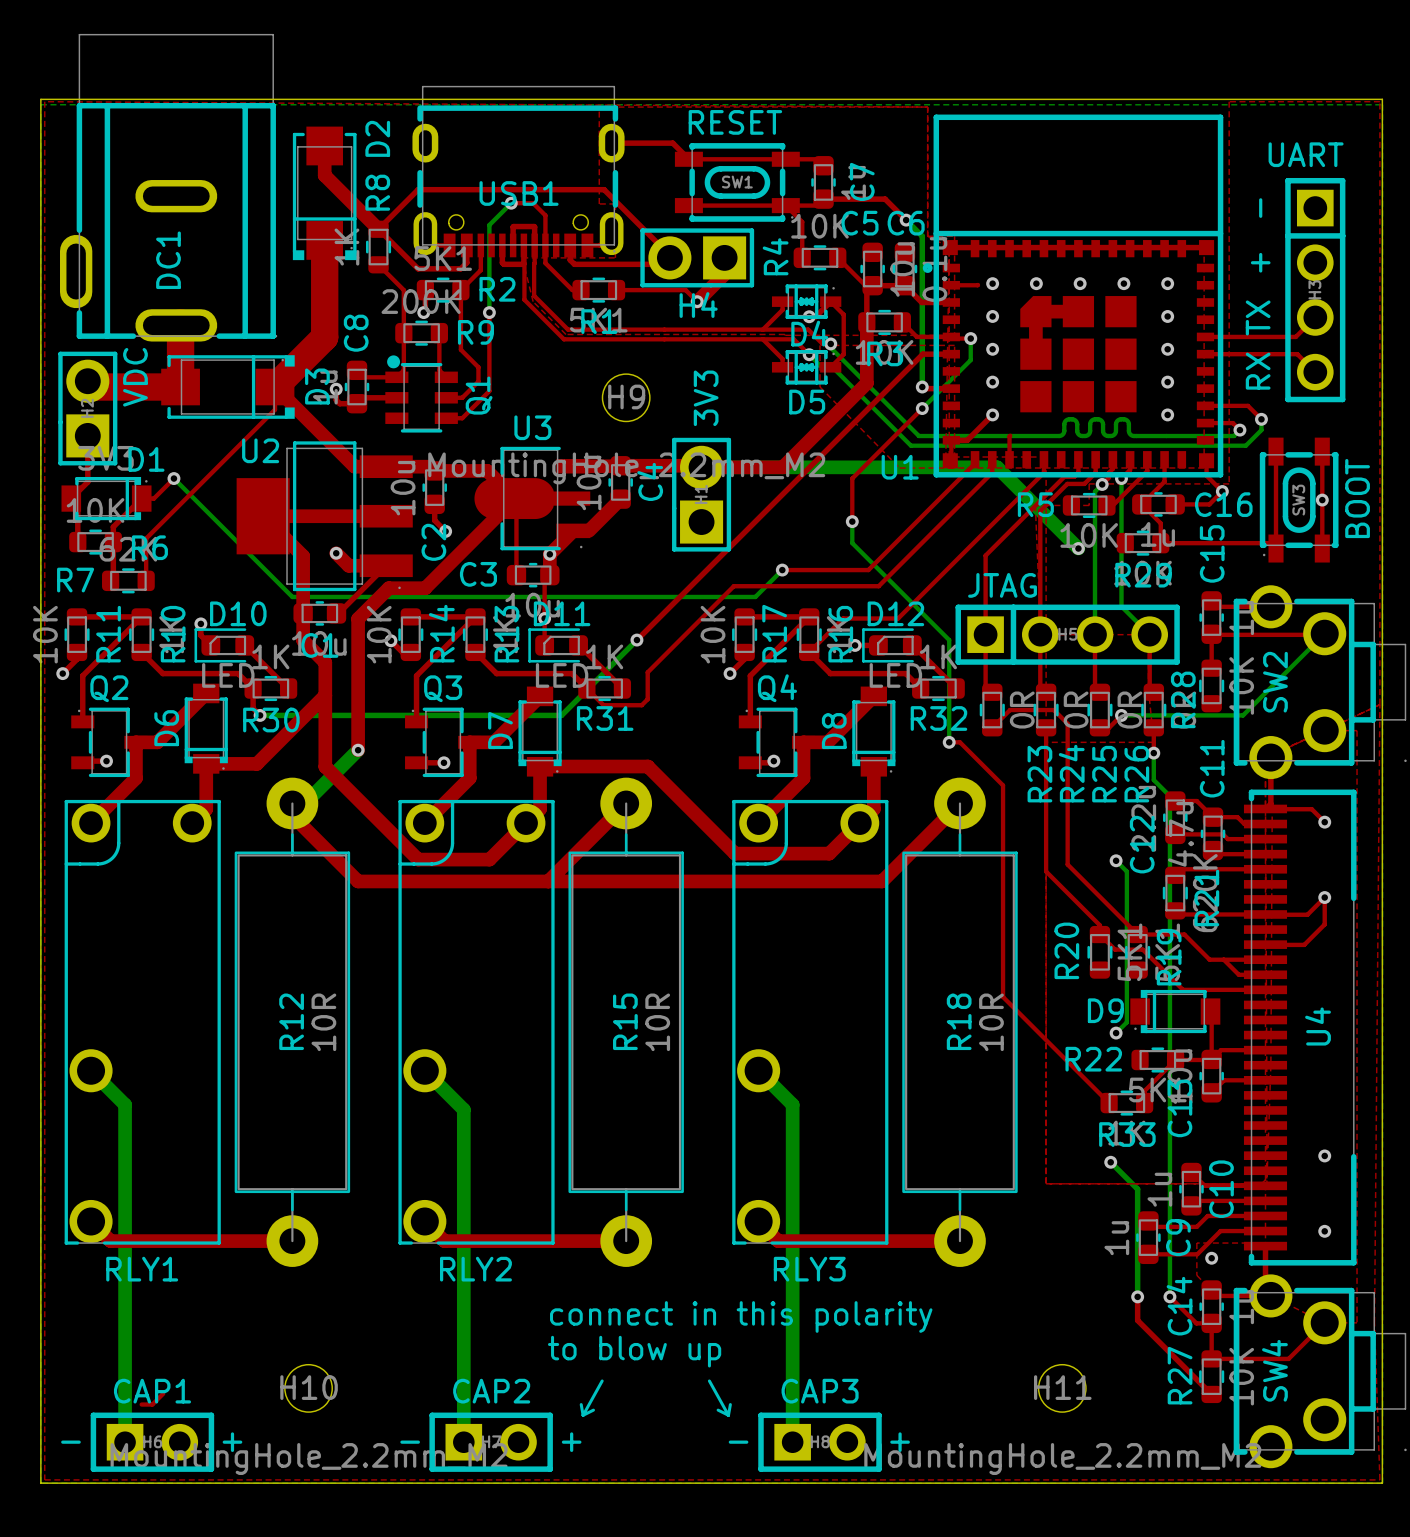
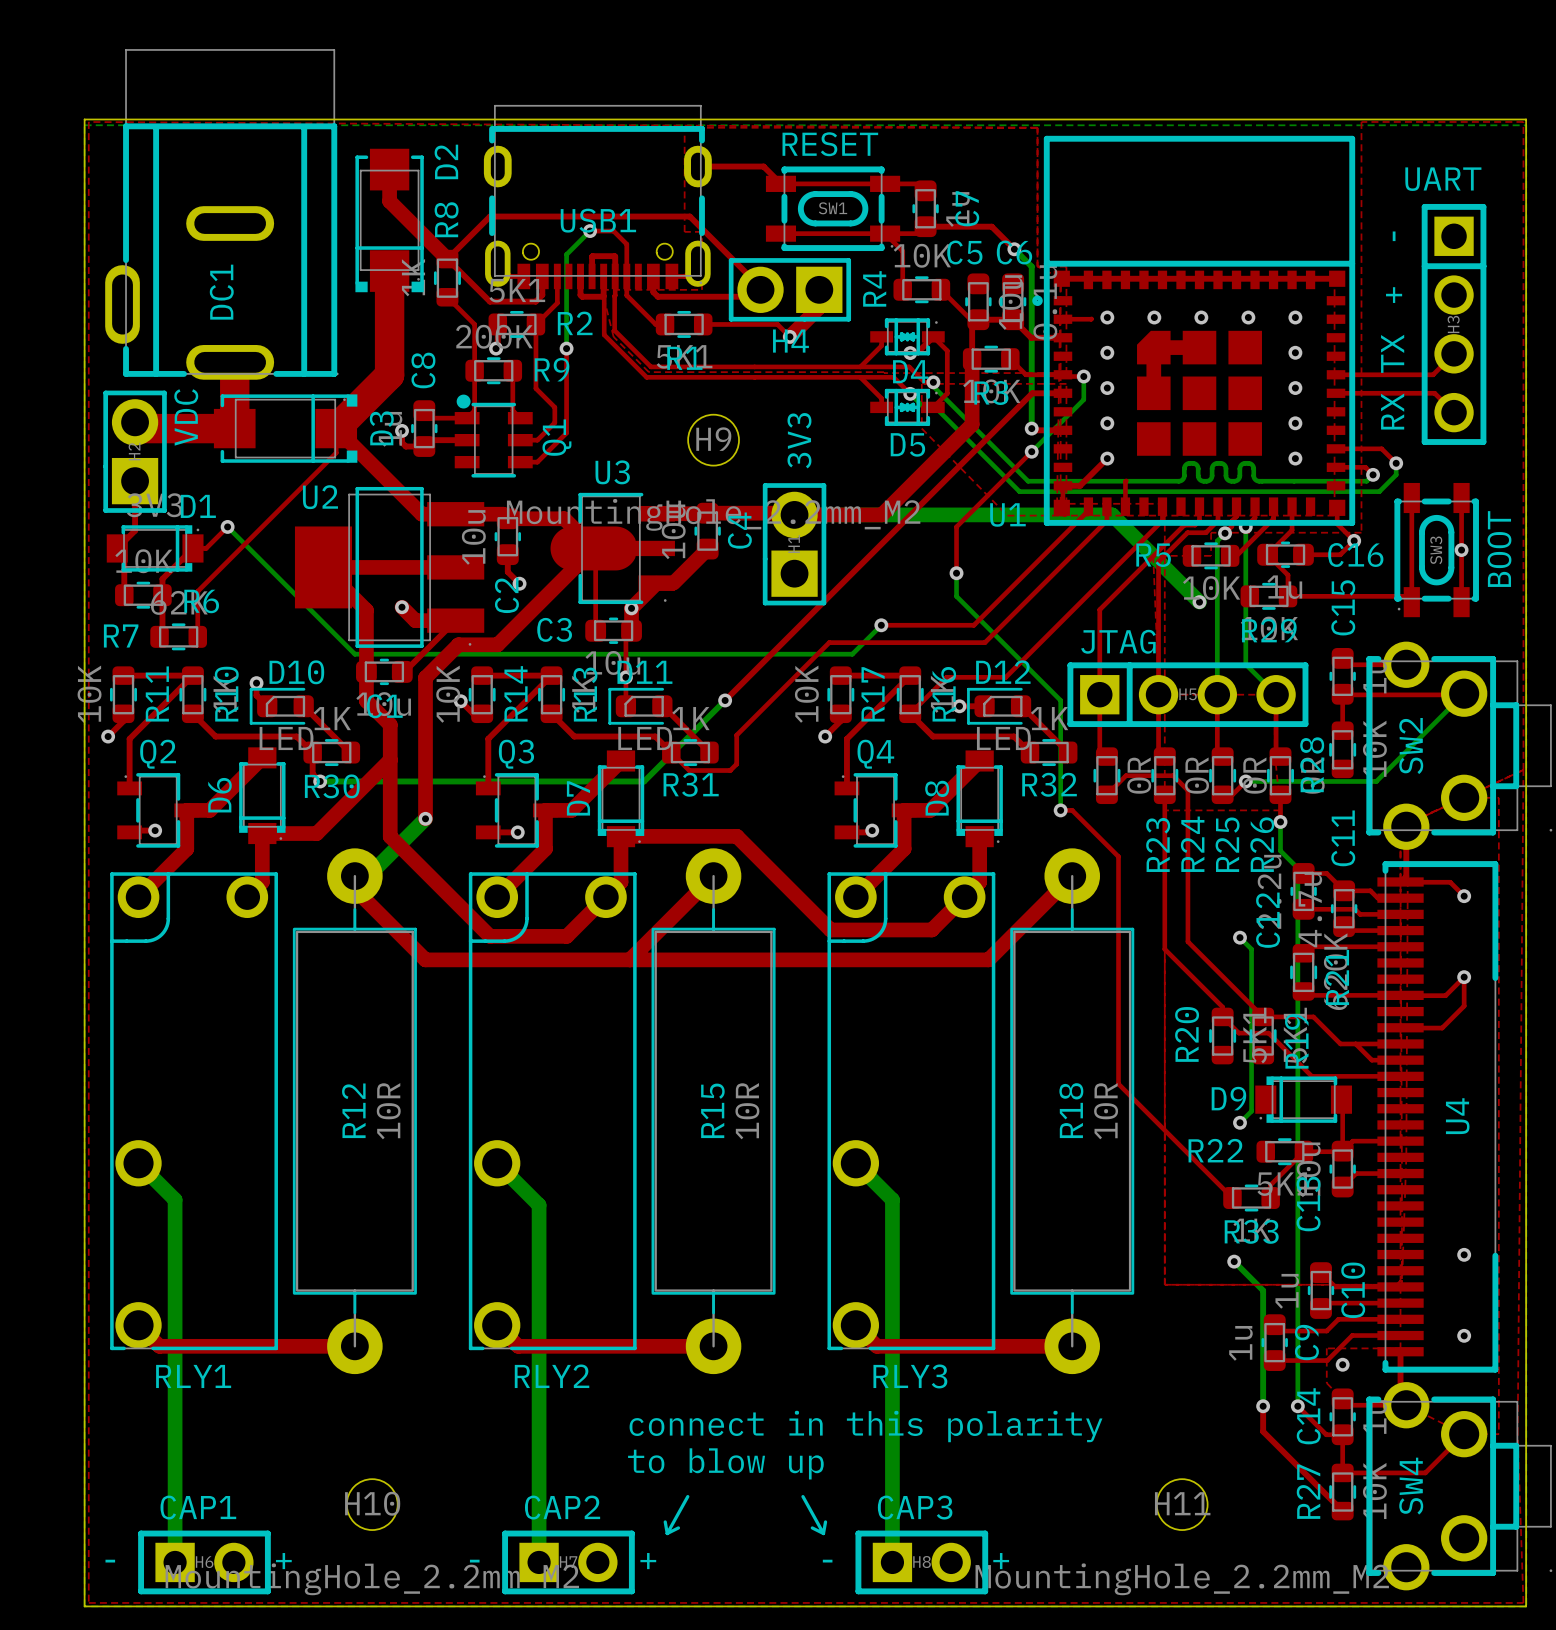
top track: (163, 1393) (152, 1404) (141, 1404) -> none

